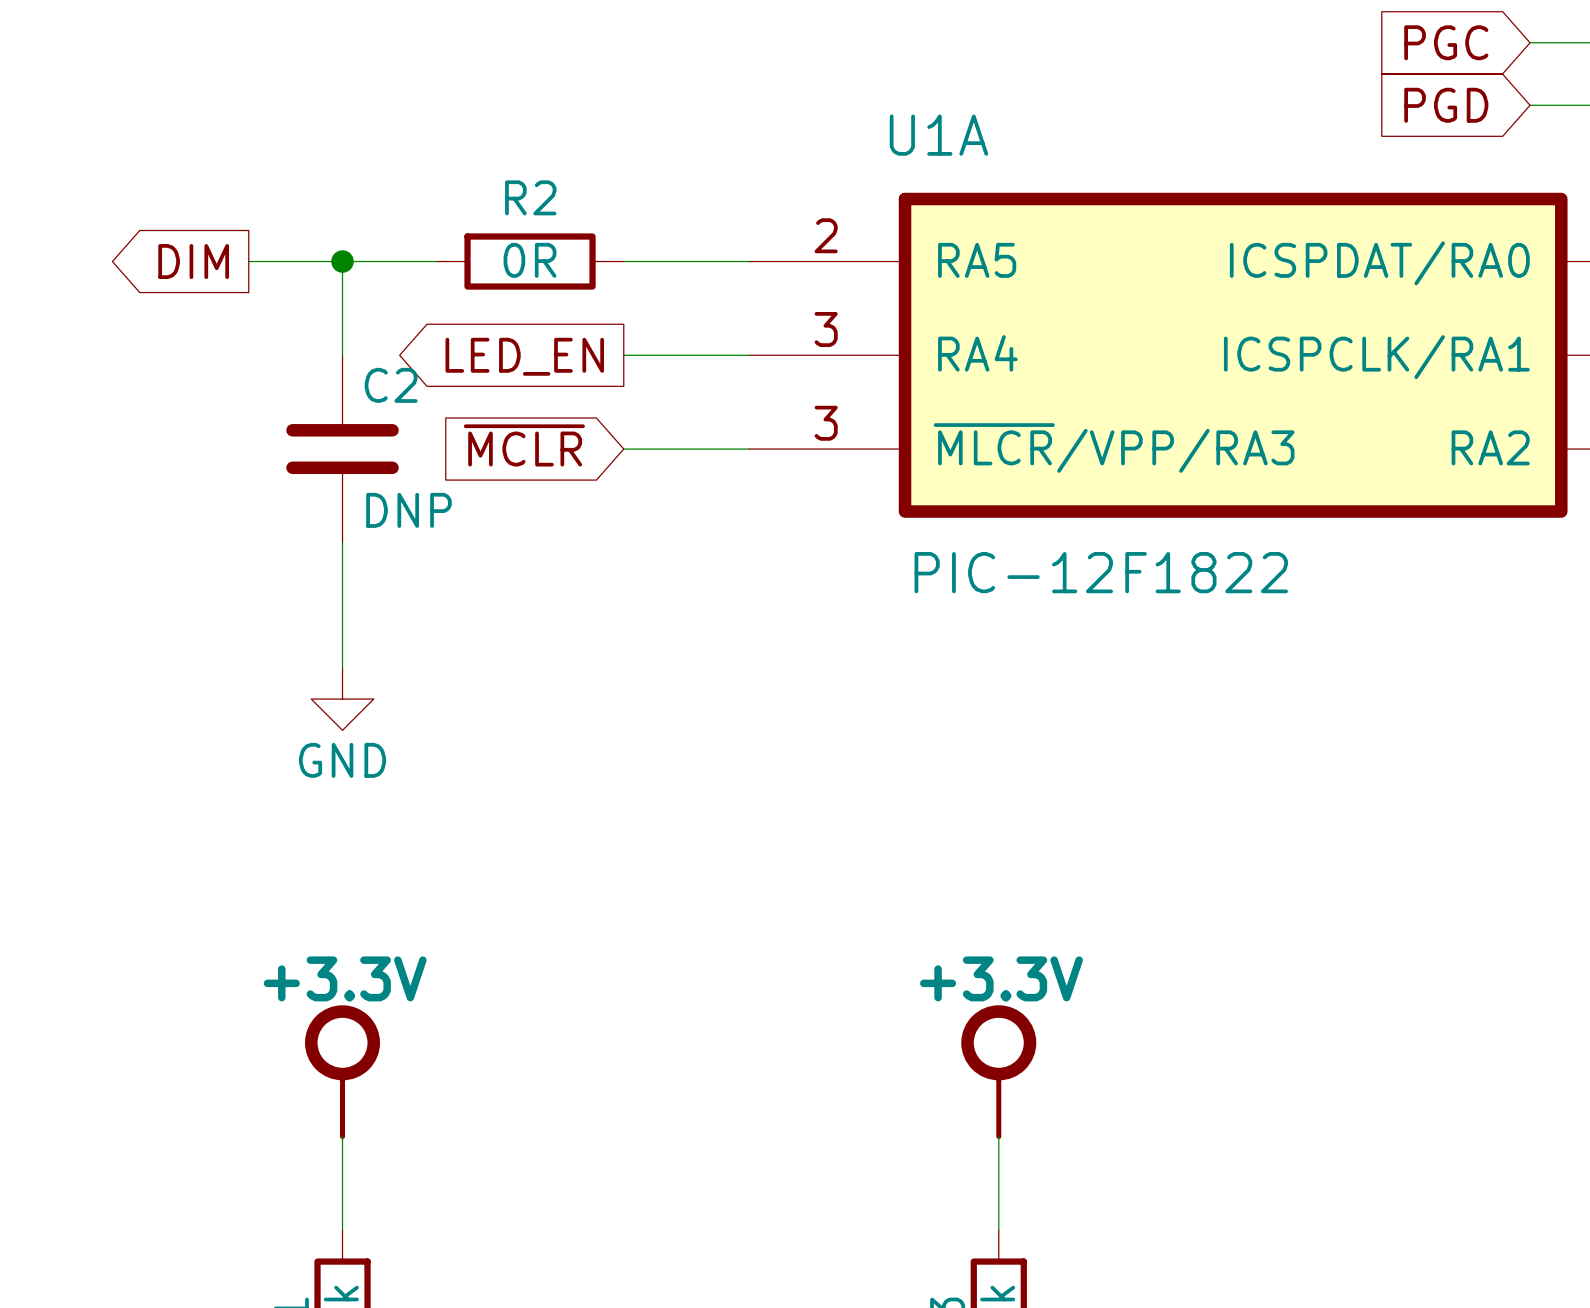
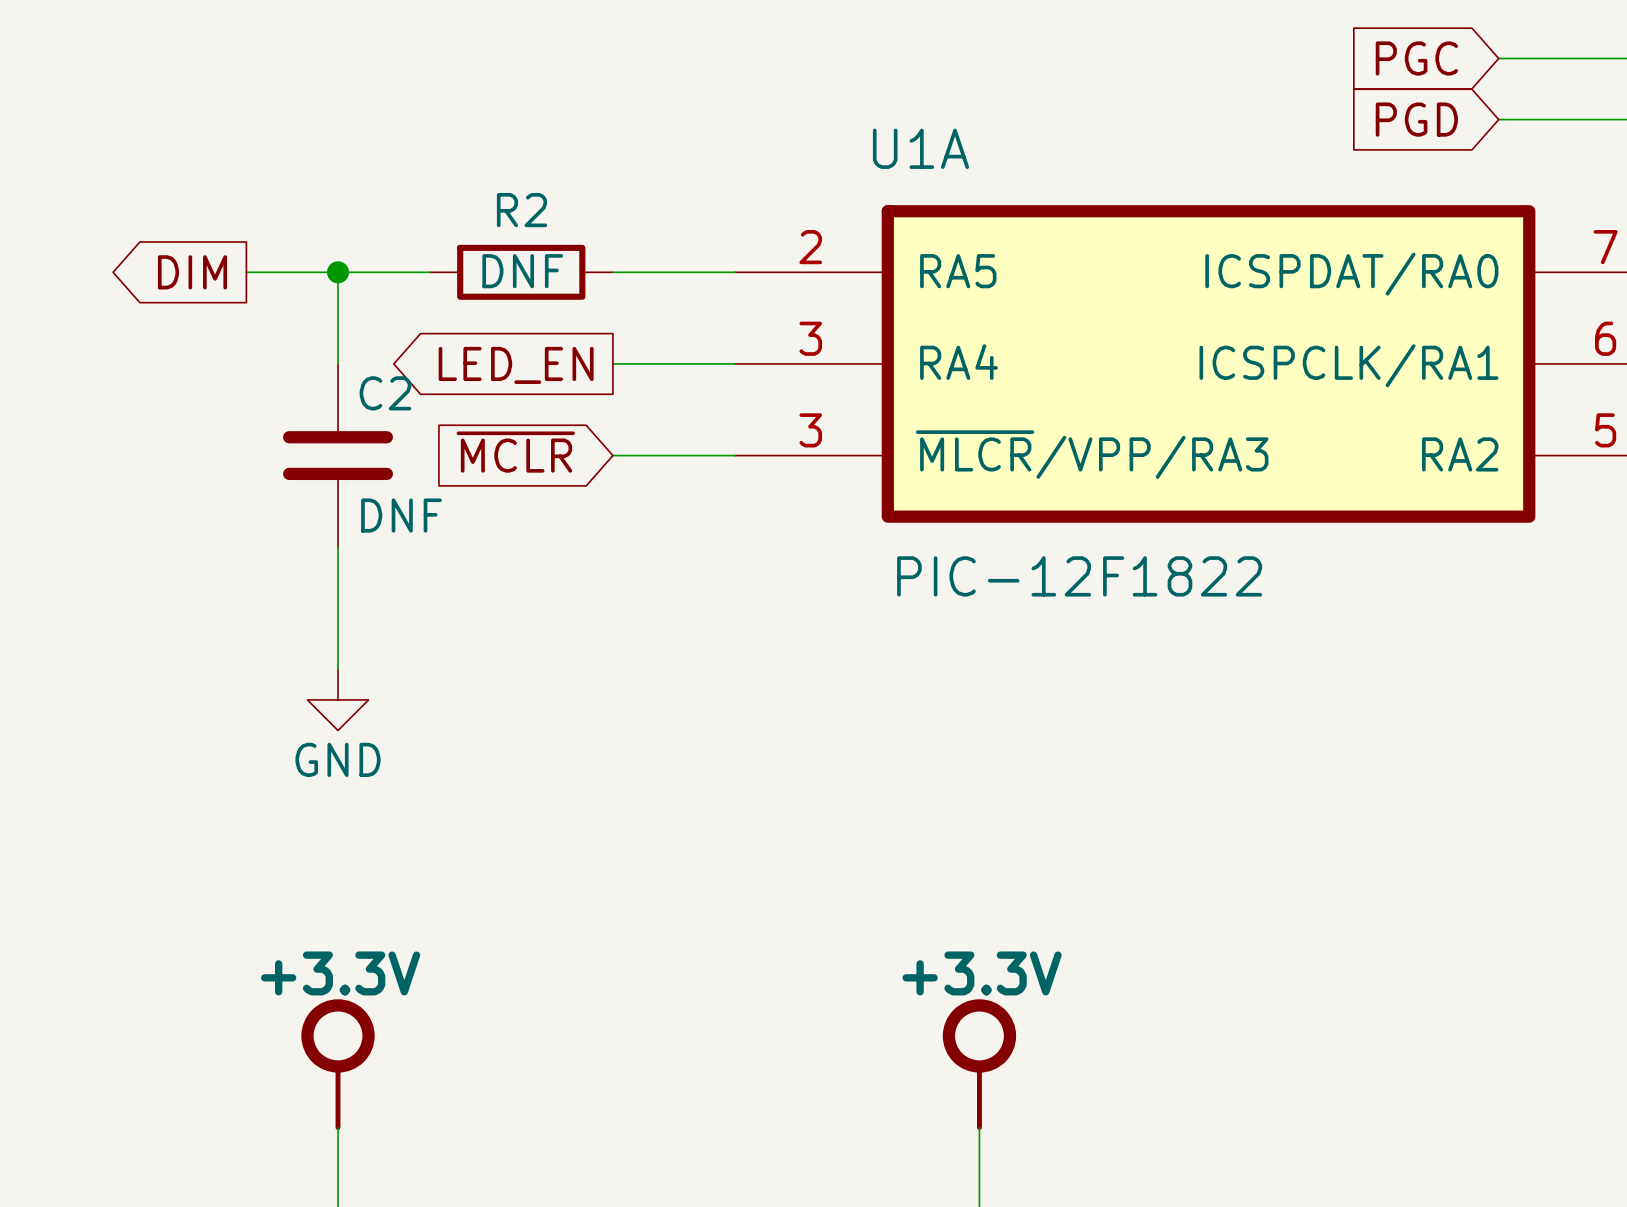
R2 value: 0R (530, 260) -> DNF (522, 271)
C2 value: DNP (408, 510) -> DNF (401, 515)

